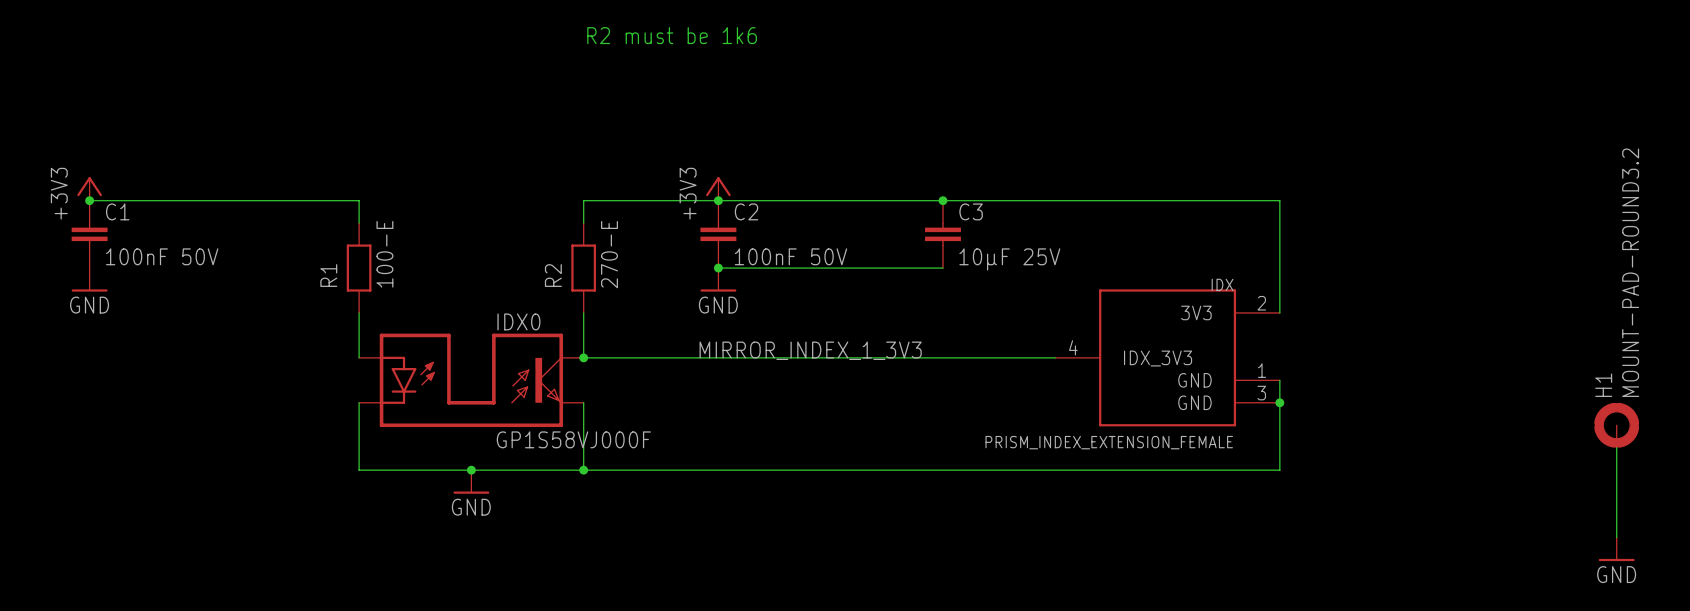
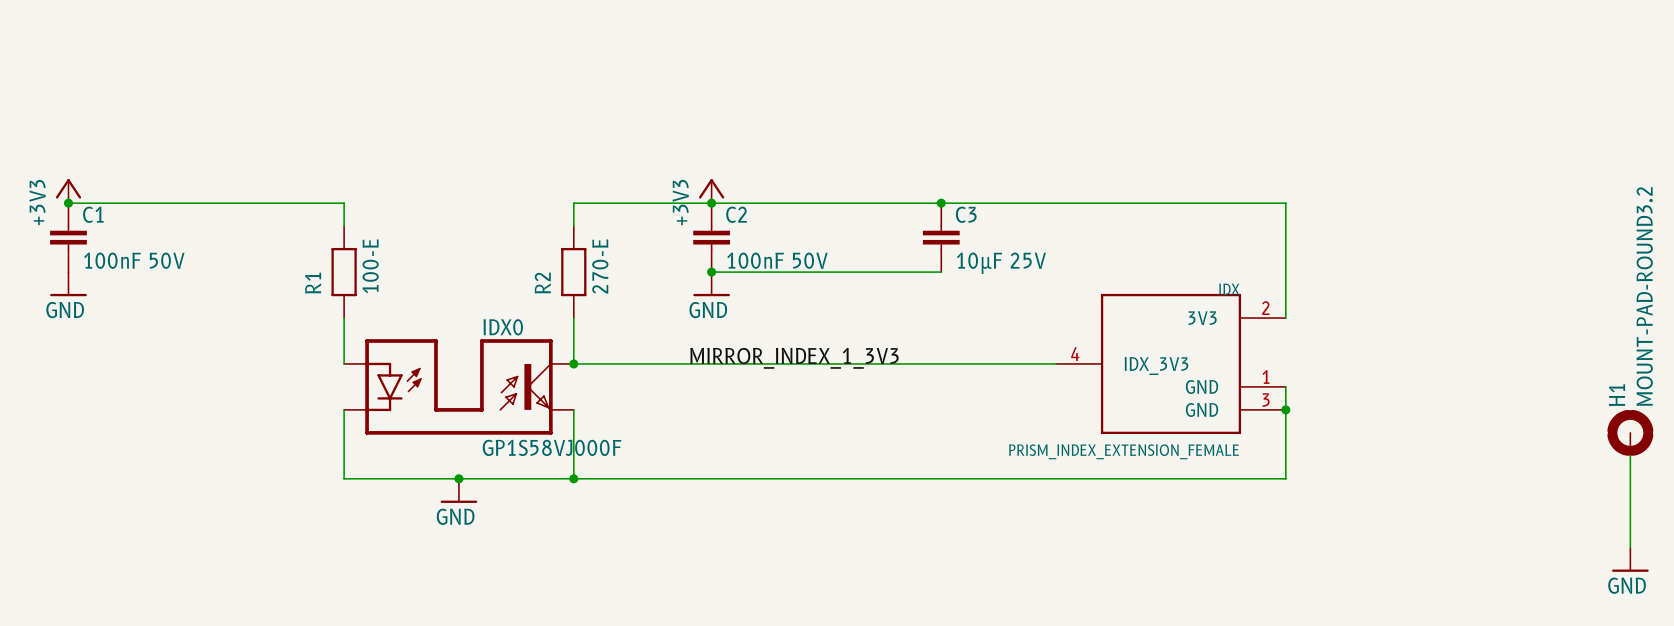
text: R2 must be 1k6 (672, 35) -> none

